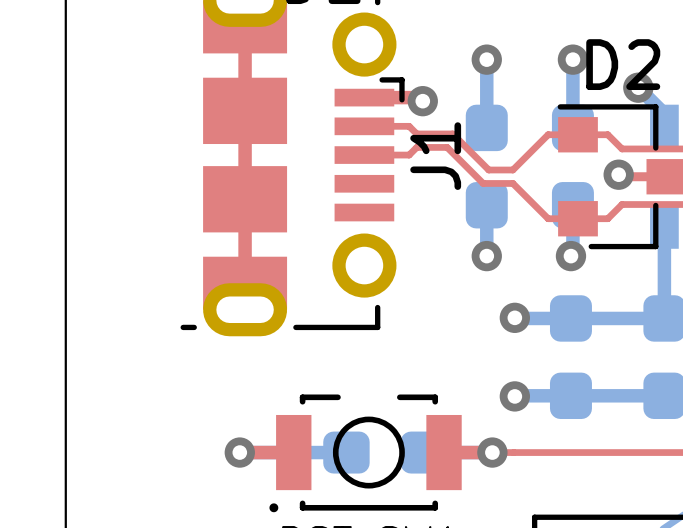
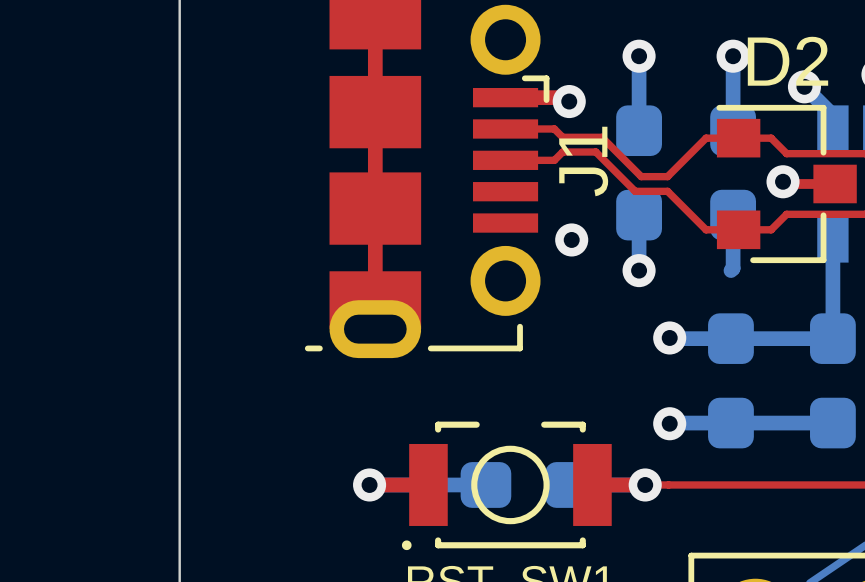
via position: (570, 256) -> (571, 239)

